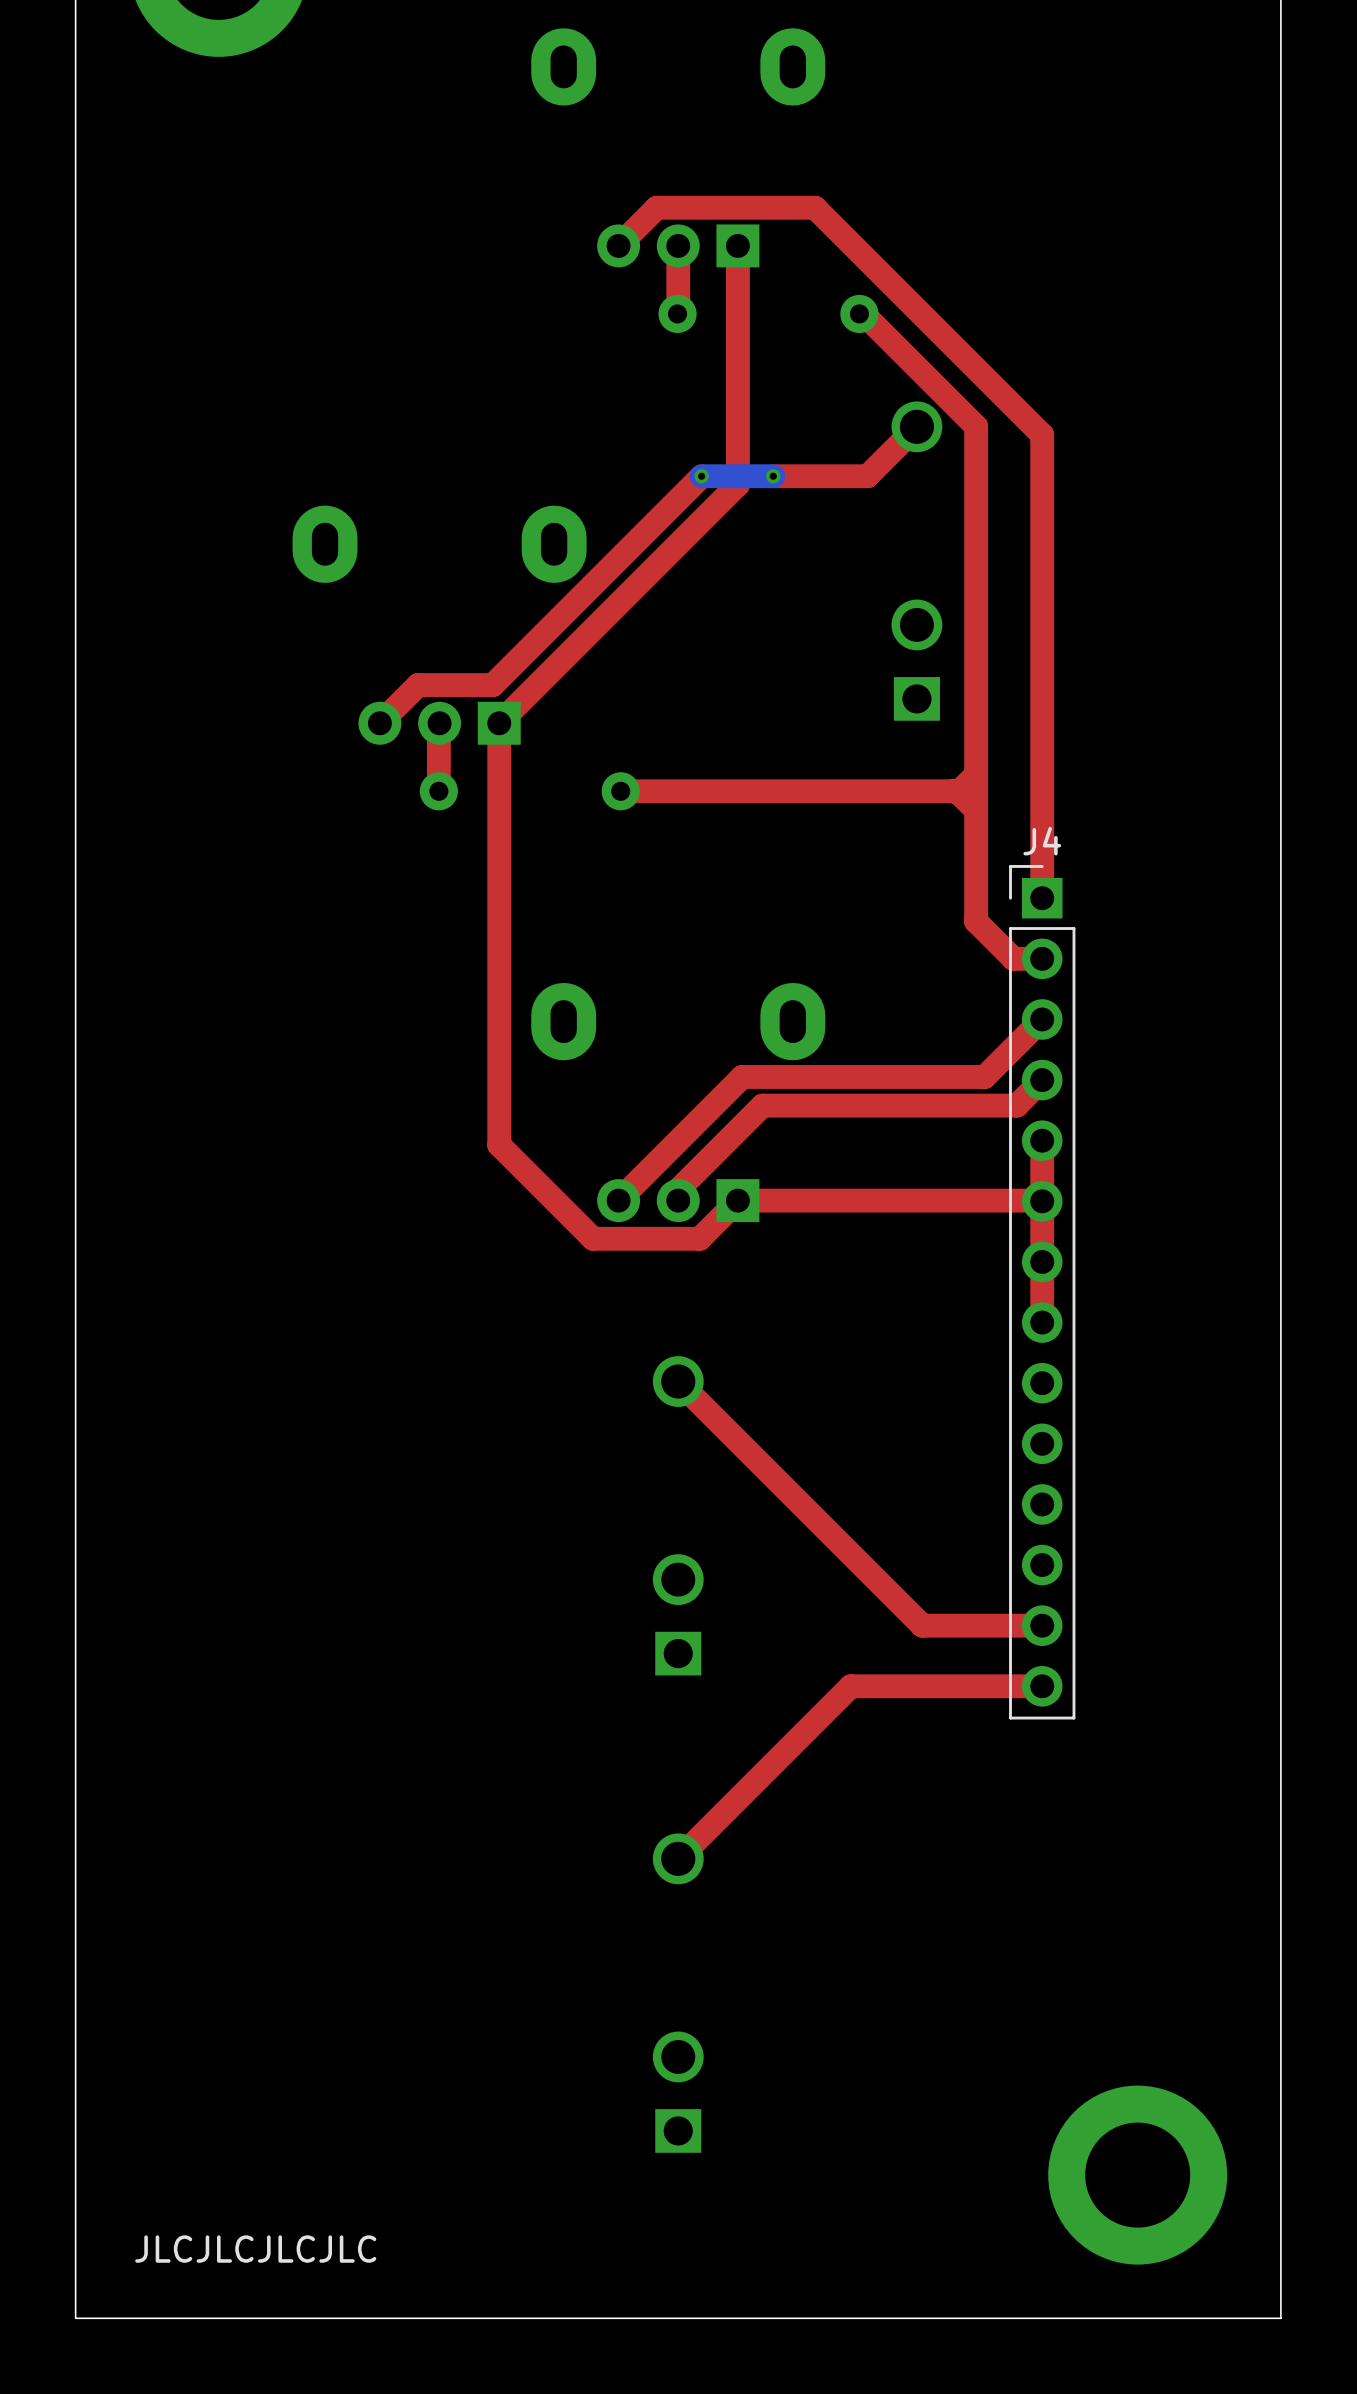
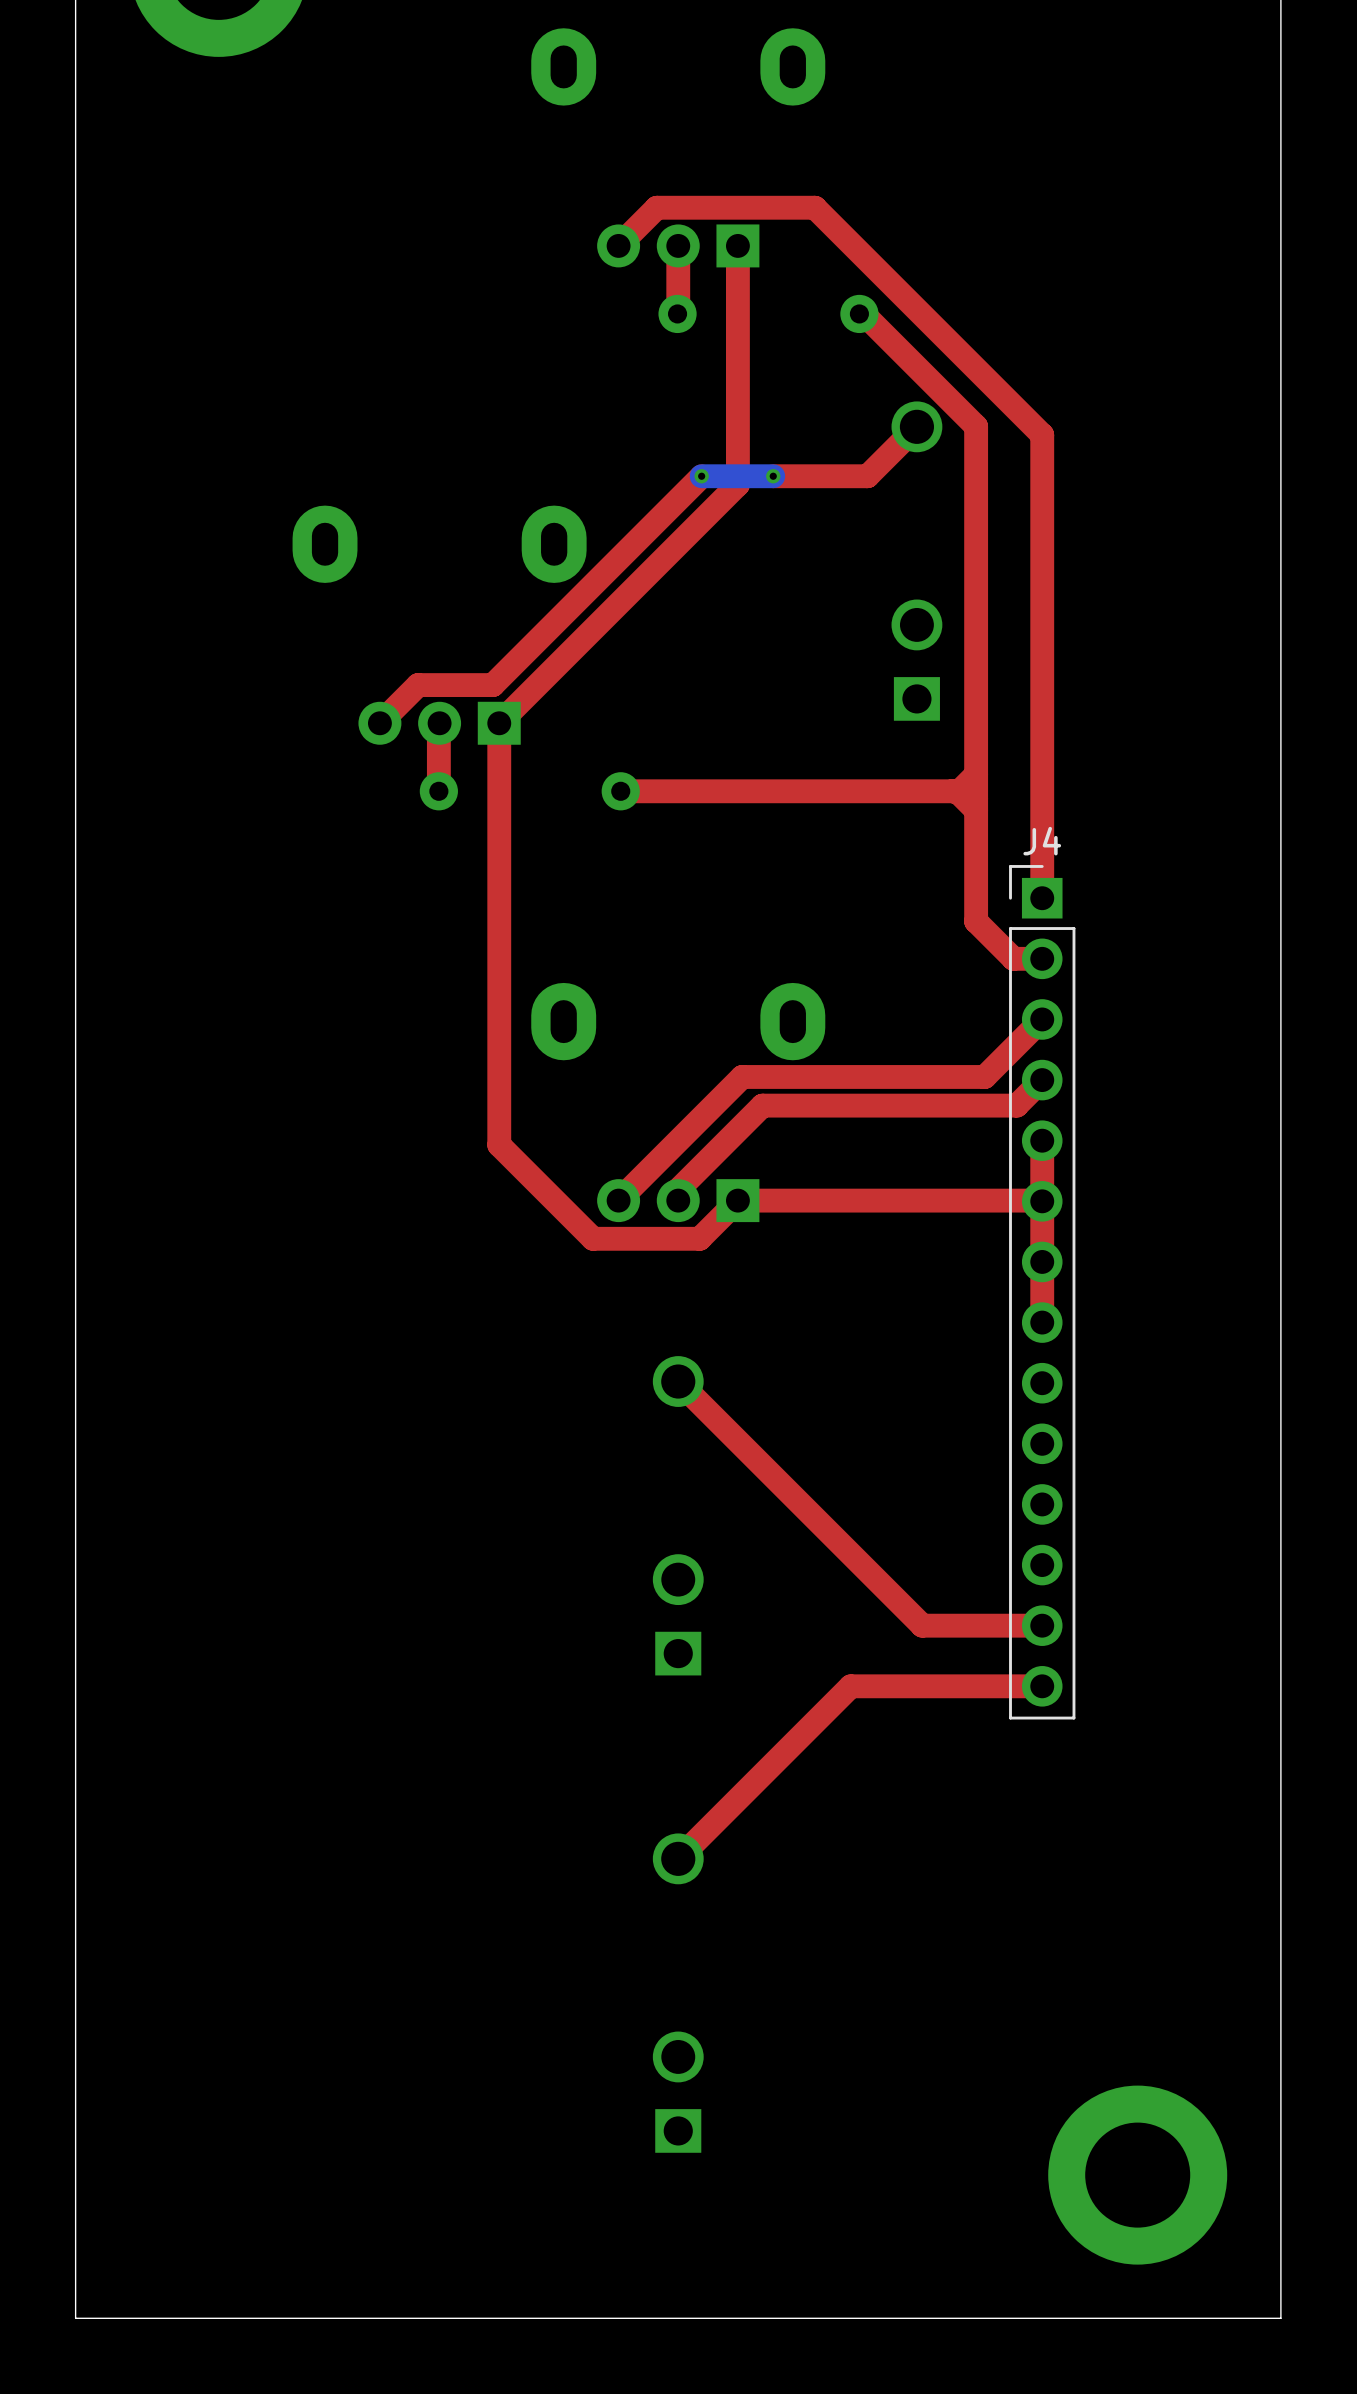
text: JLCJLCJLCJLC (255, 2249) -> none

